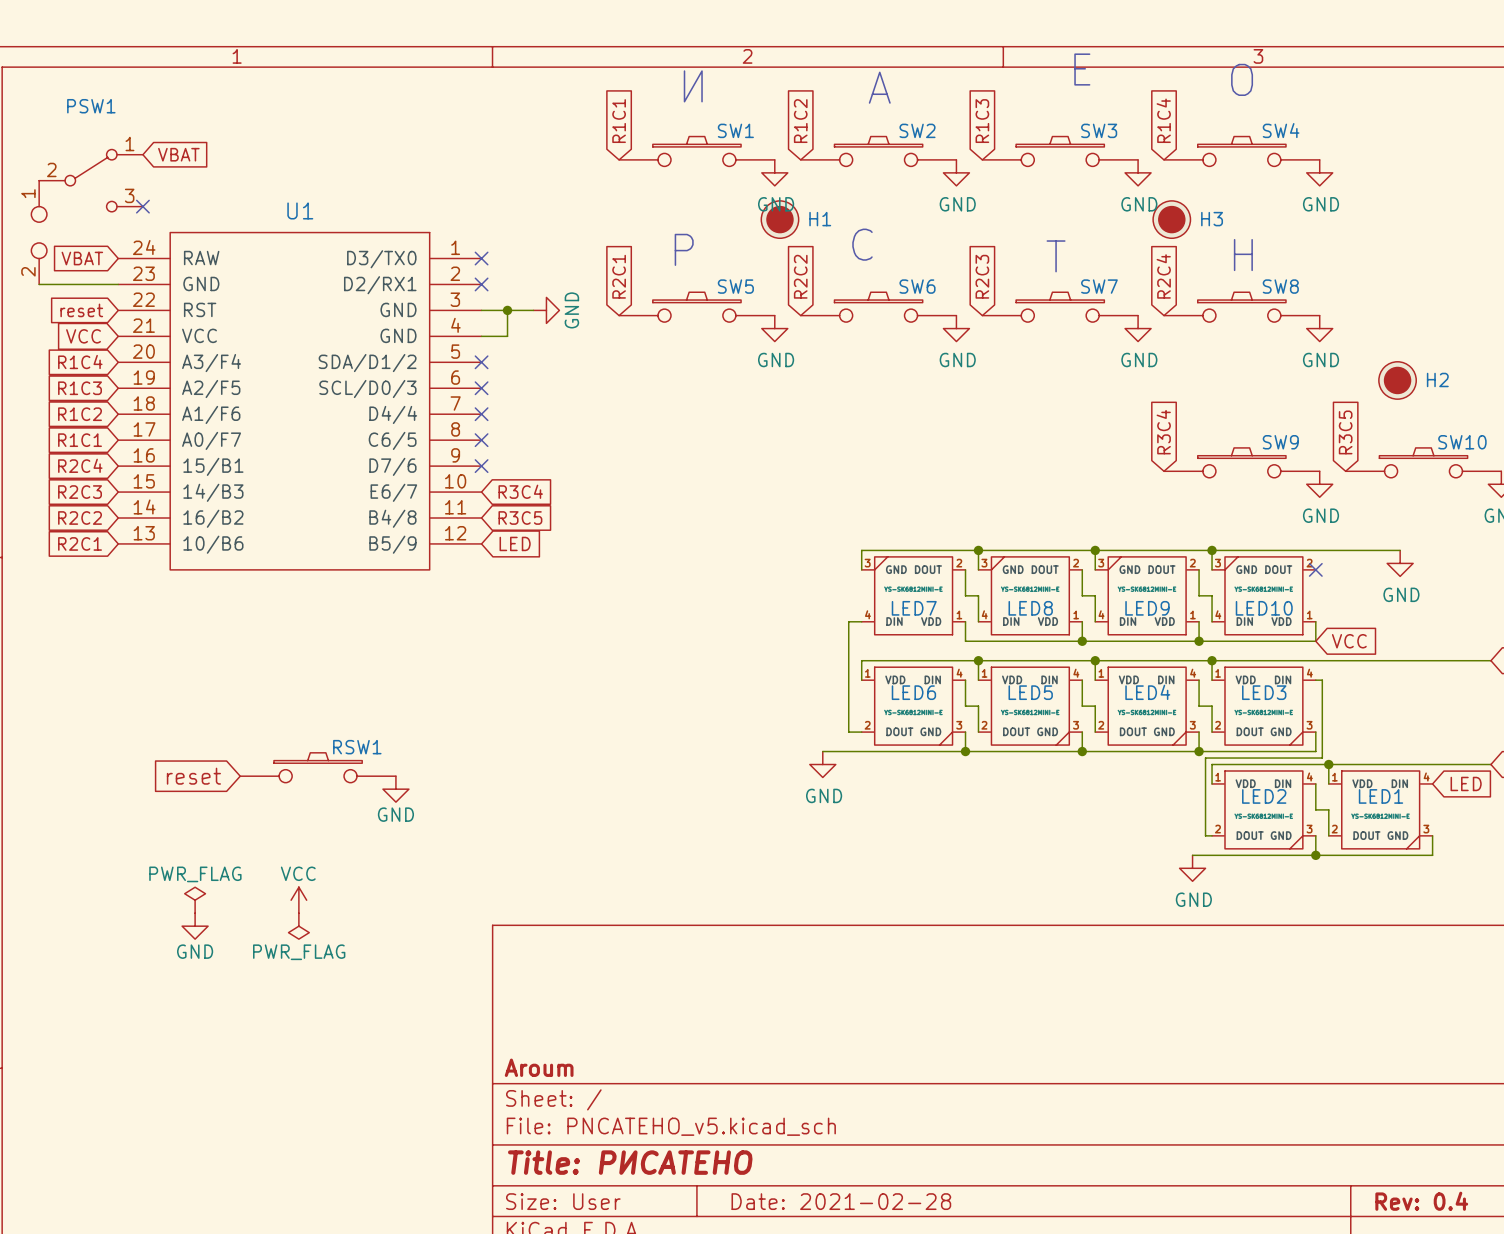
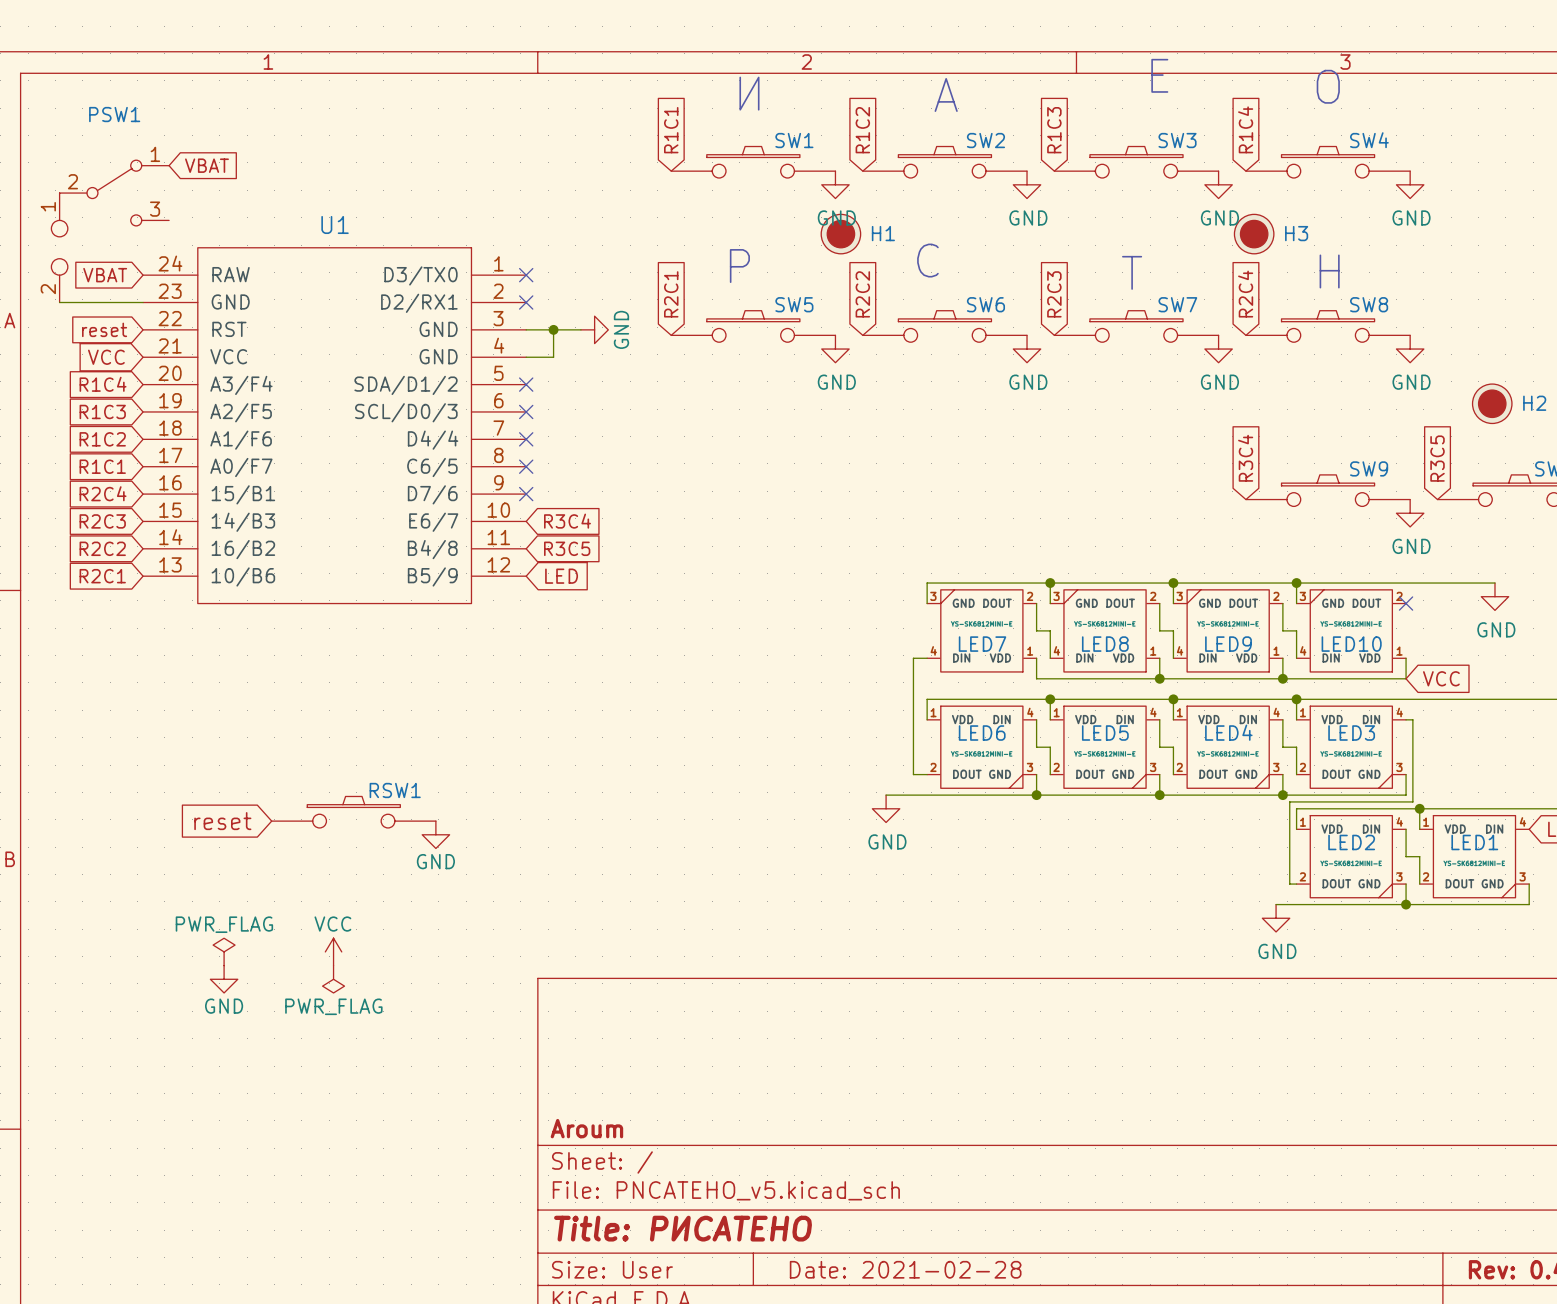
no-connect mark: (142, 206) -> none

